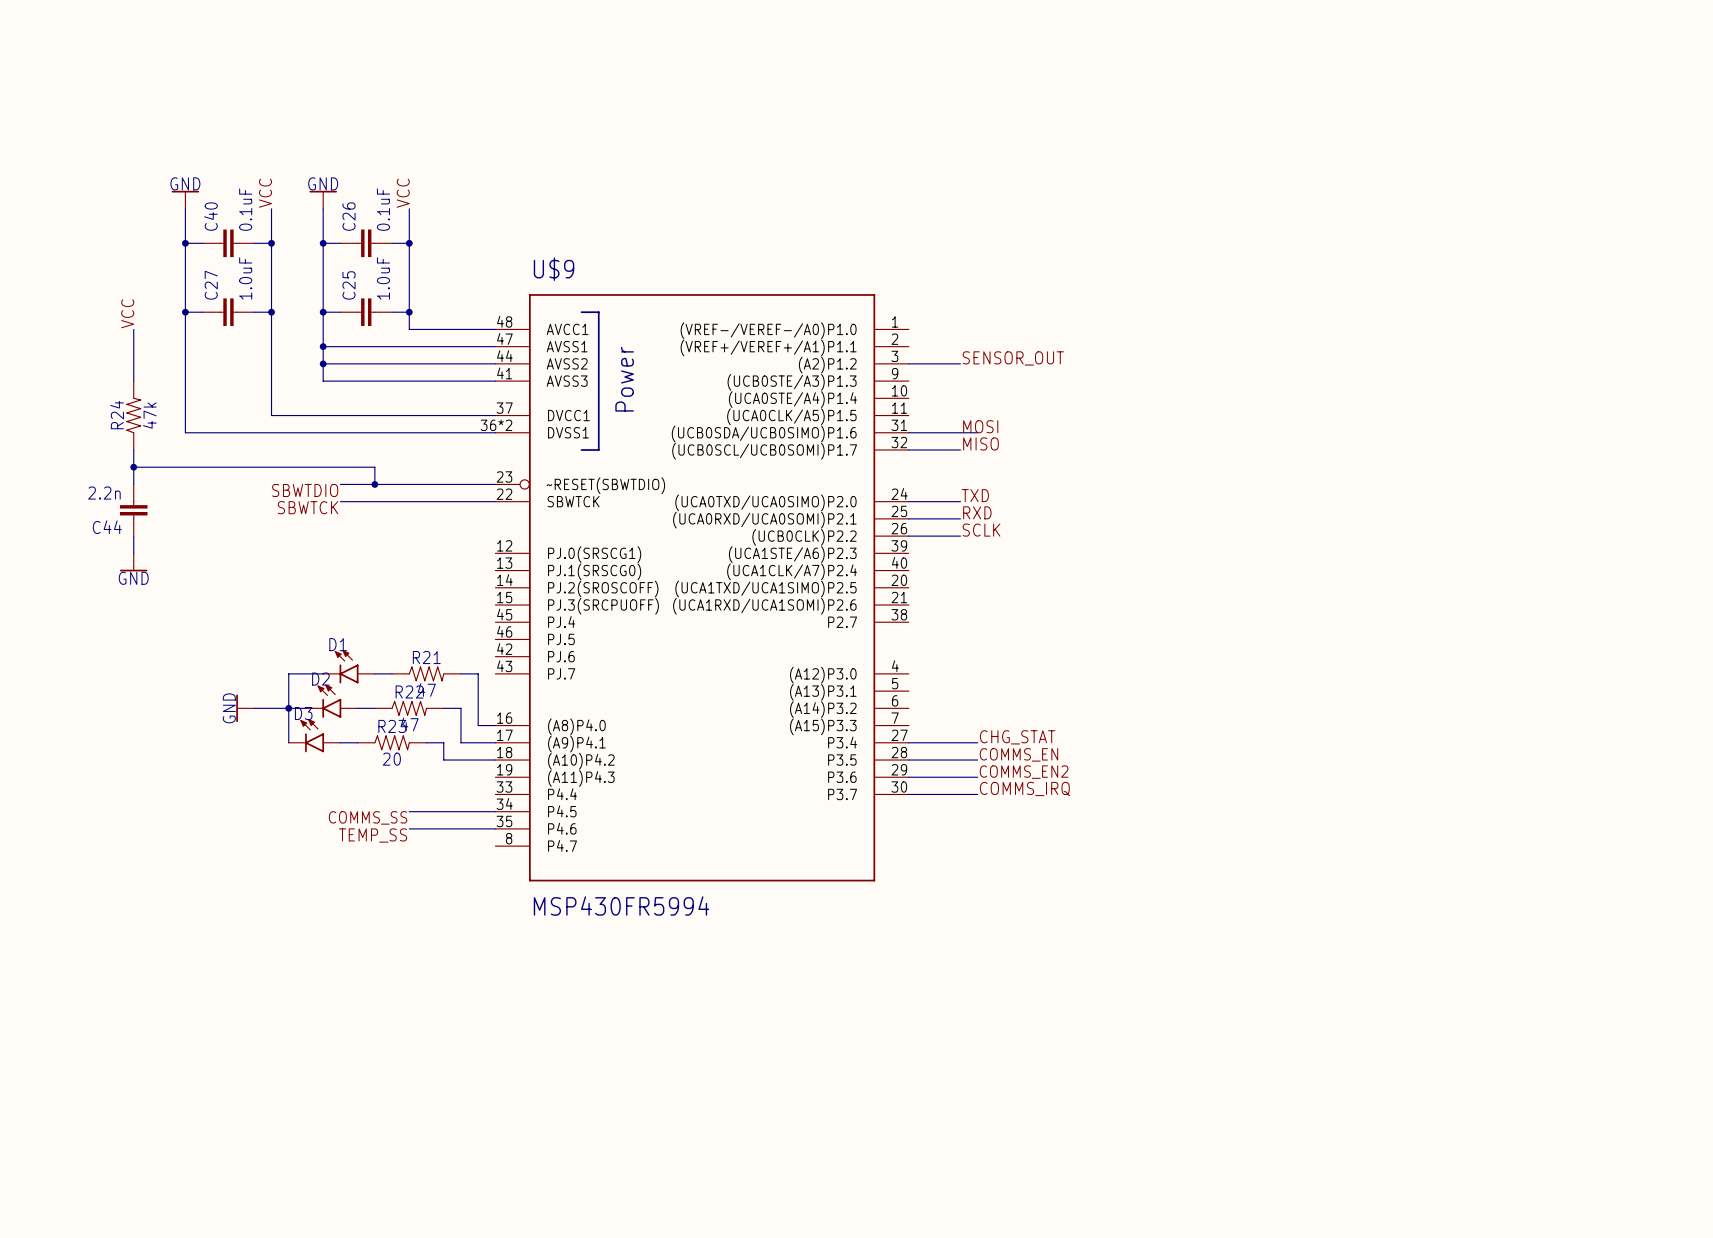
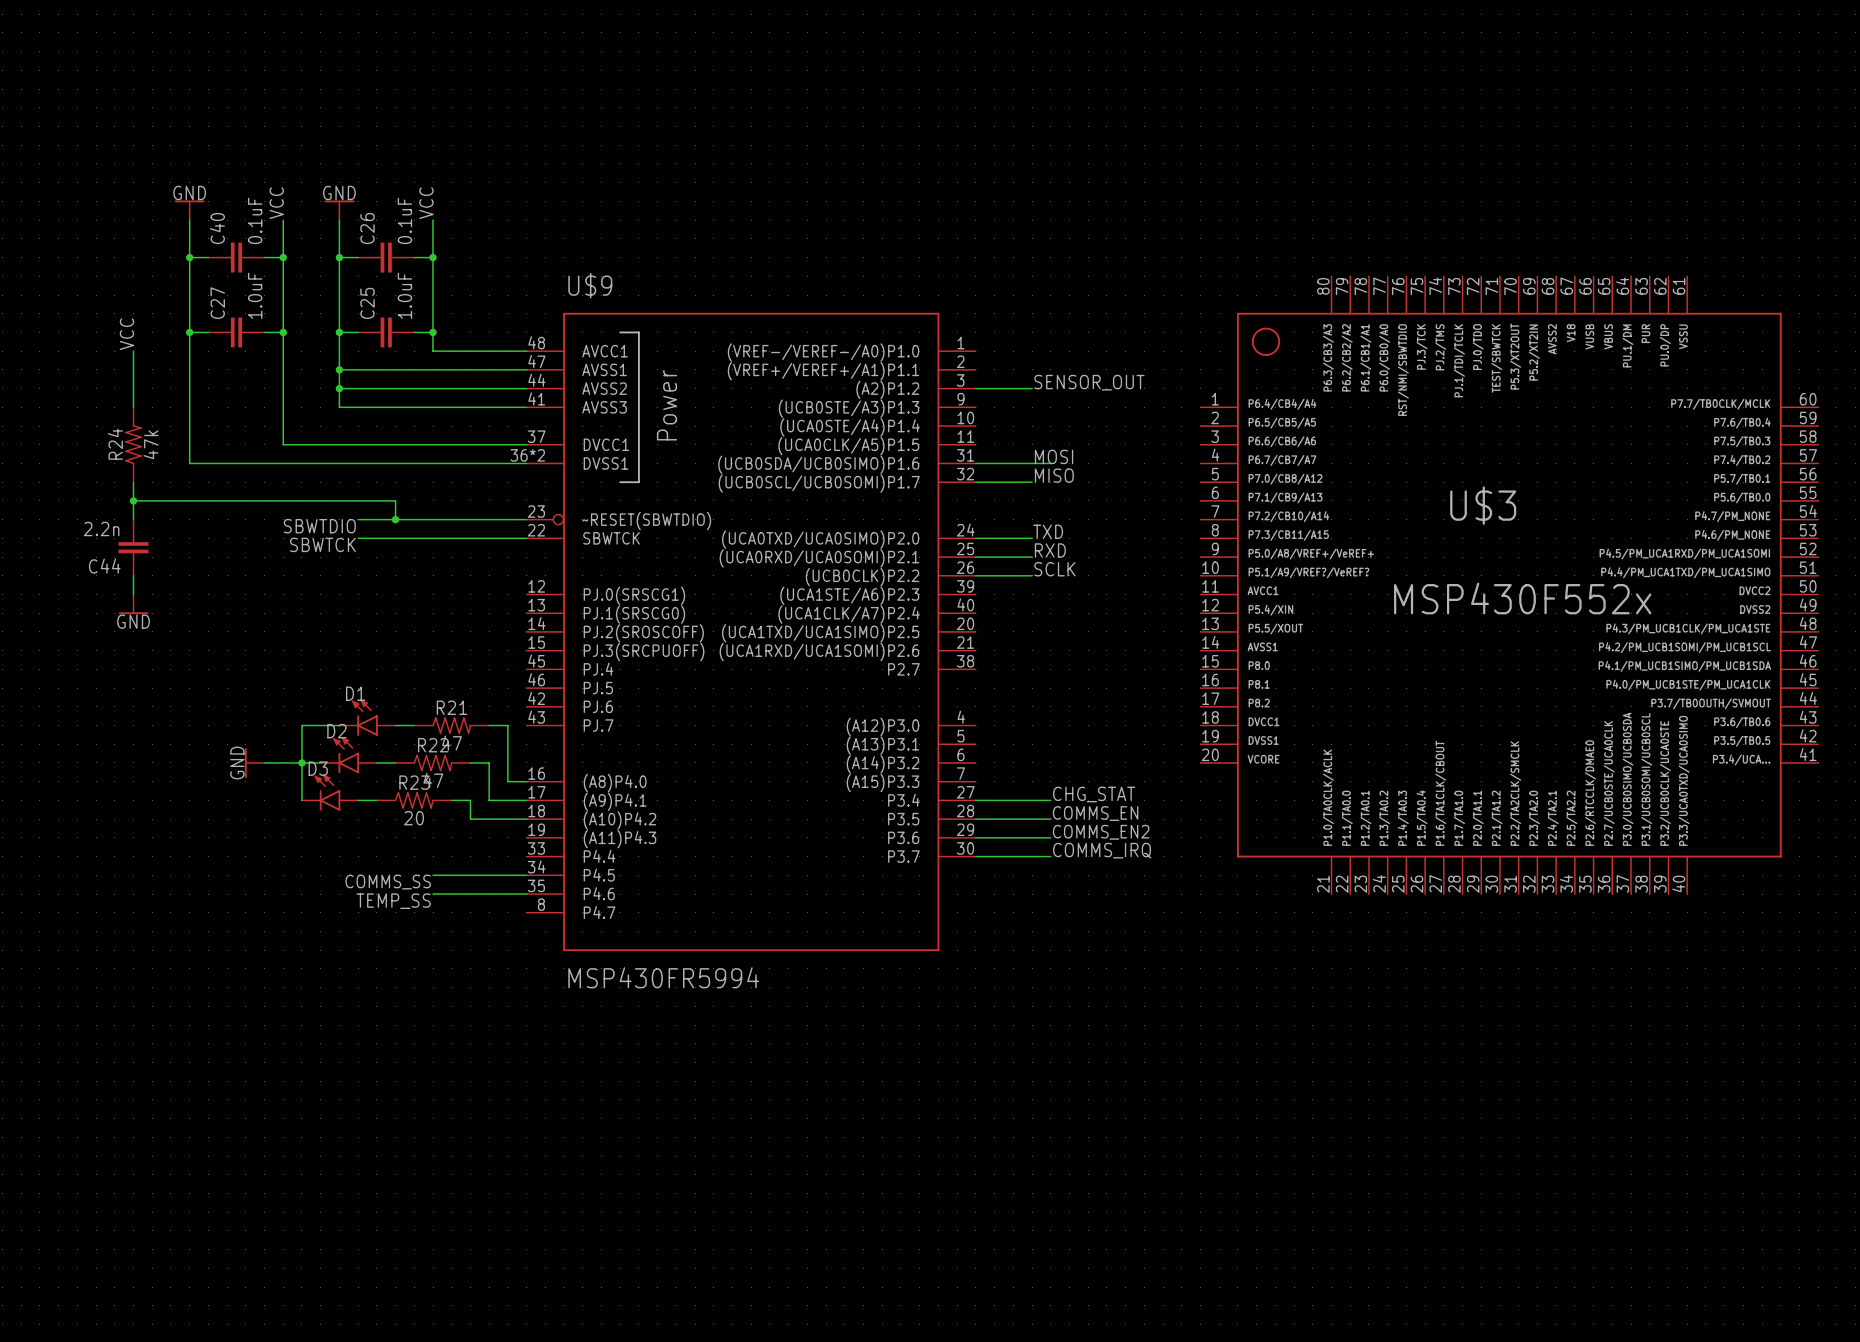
U$3: none -> (1509, 585)

